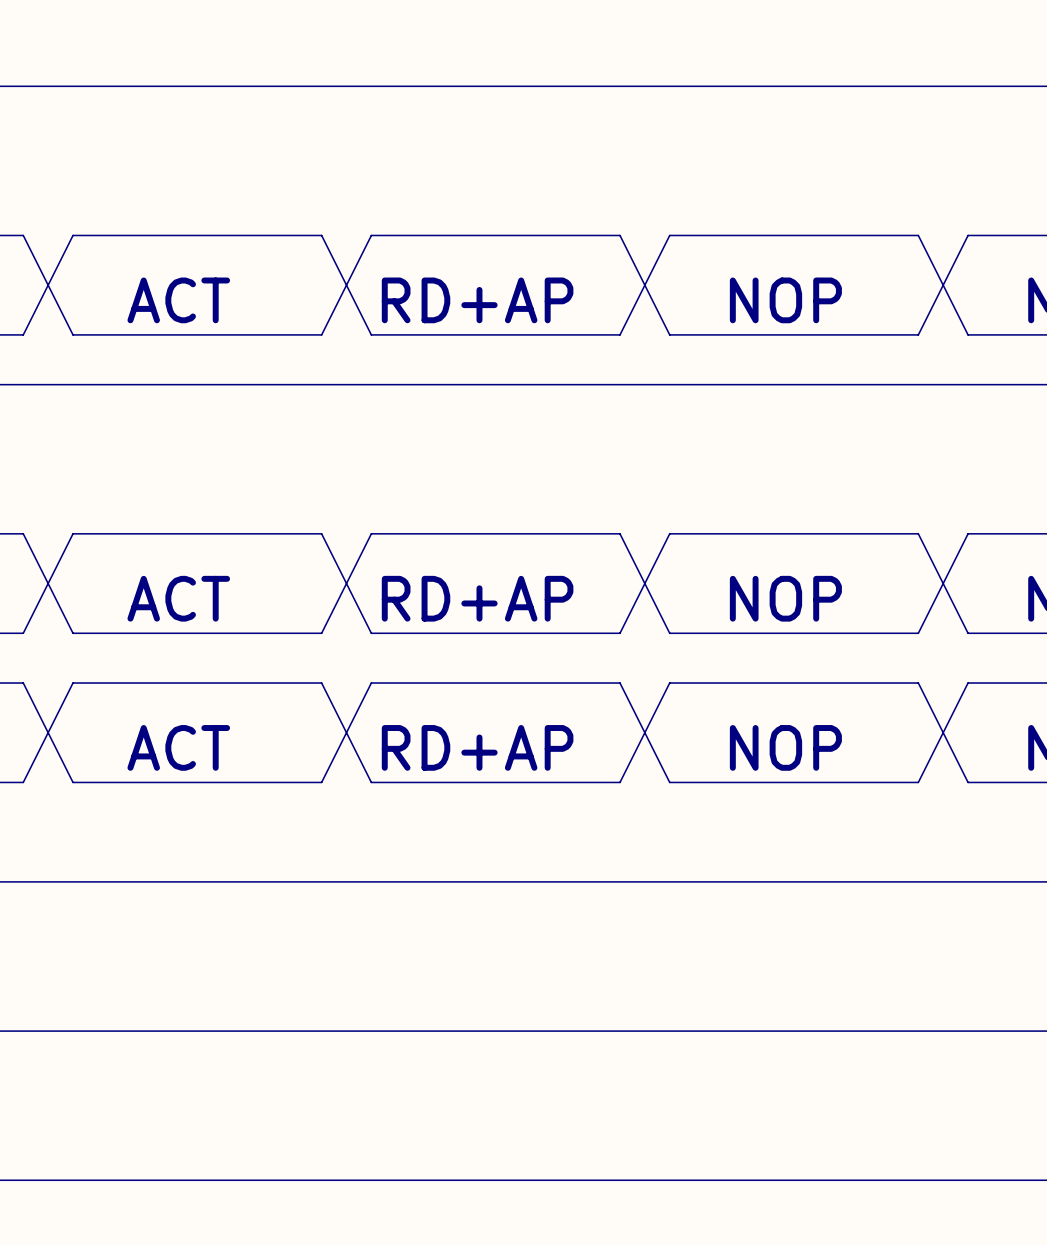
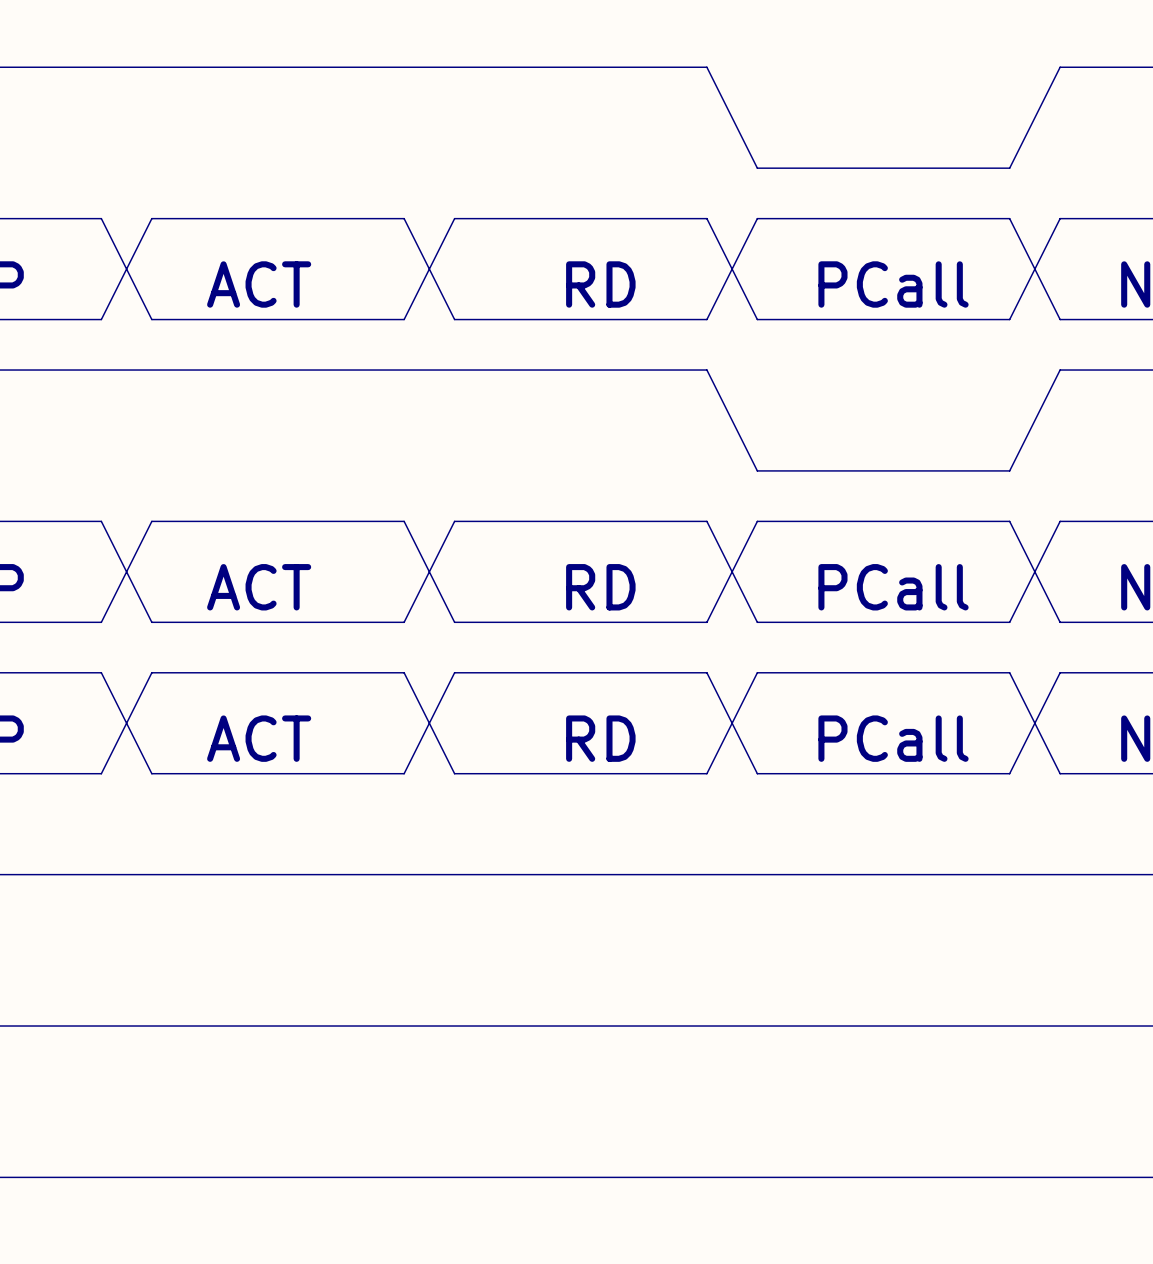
wire: (619, 86) (968, 86) -> (706, 67) (757, 168) (1009, 168) (1060, 67)
text: RD+AP (477, 300) -> none
text: none -> RD (600, 284)
text: NOP (785, 300) -> PCall (893, 284)
wire: (619, 384) (968, 384) -> (706, 370) (757, 470) (1009, 470) (1060, 370)
text: RD+AP (477, 598) -> none
text: none -> RD (600, 587)
text: NOP (785, 598) -> PCall (893, 587)
text: RD+AP (477, 747) -> none
text: none -> RD (600, 738)
text: NOP (785, 747) -> PCall (893, 738)

